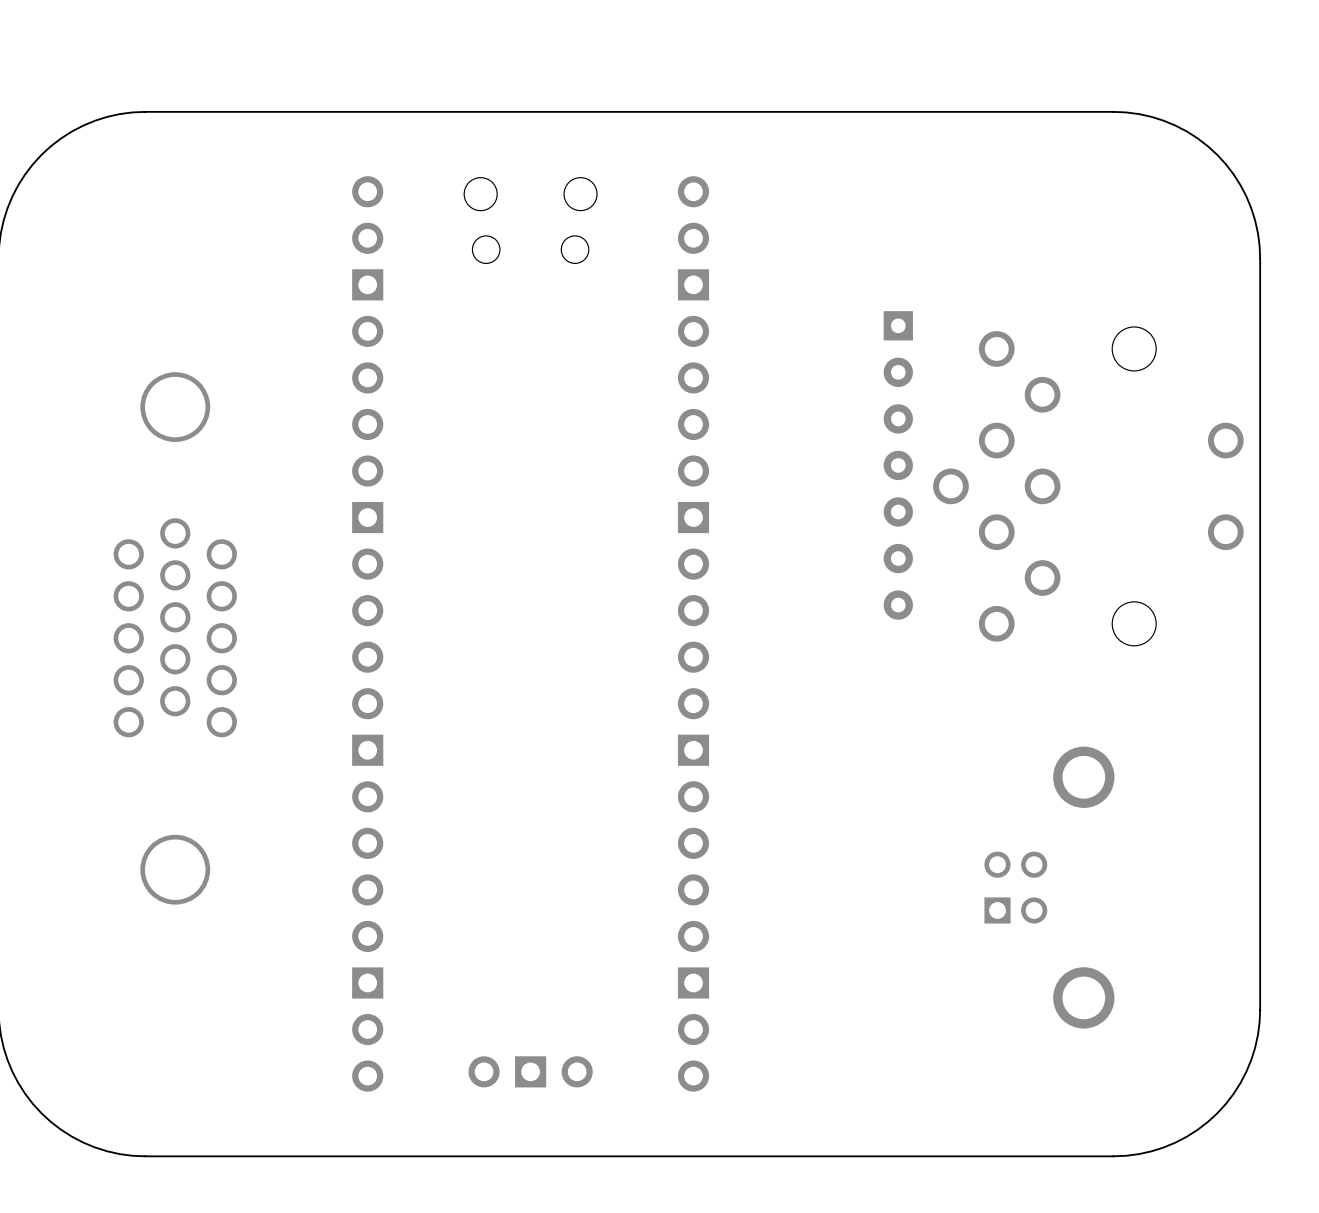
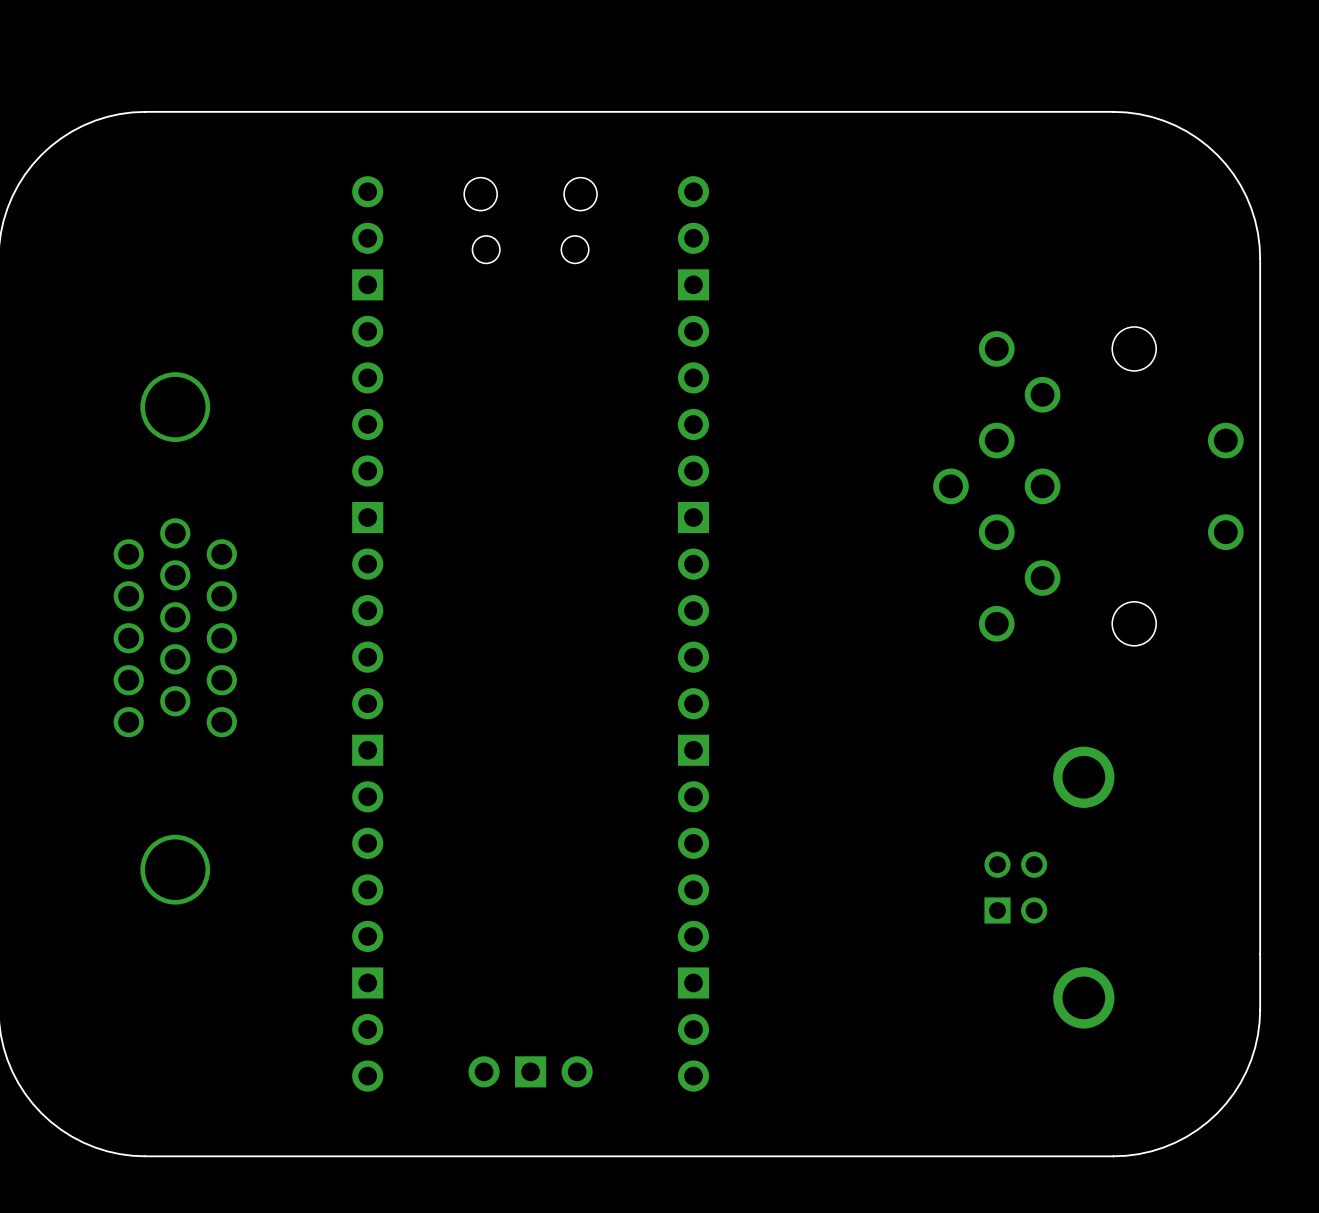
part: (898, 465) -> none

